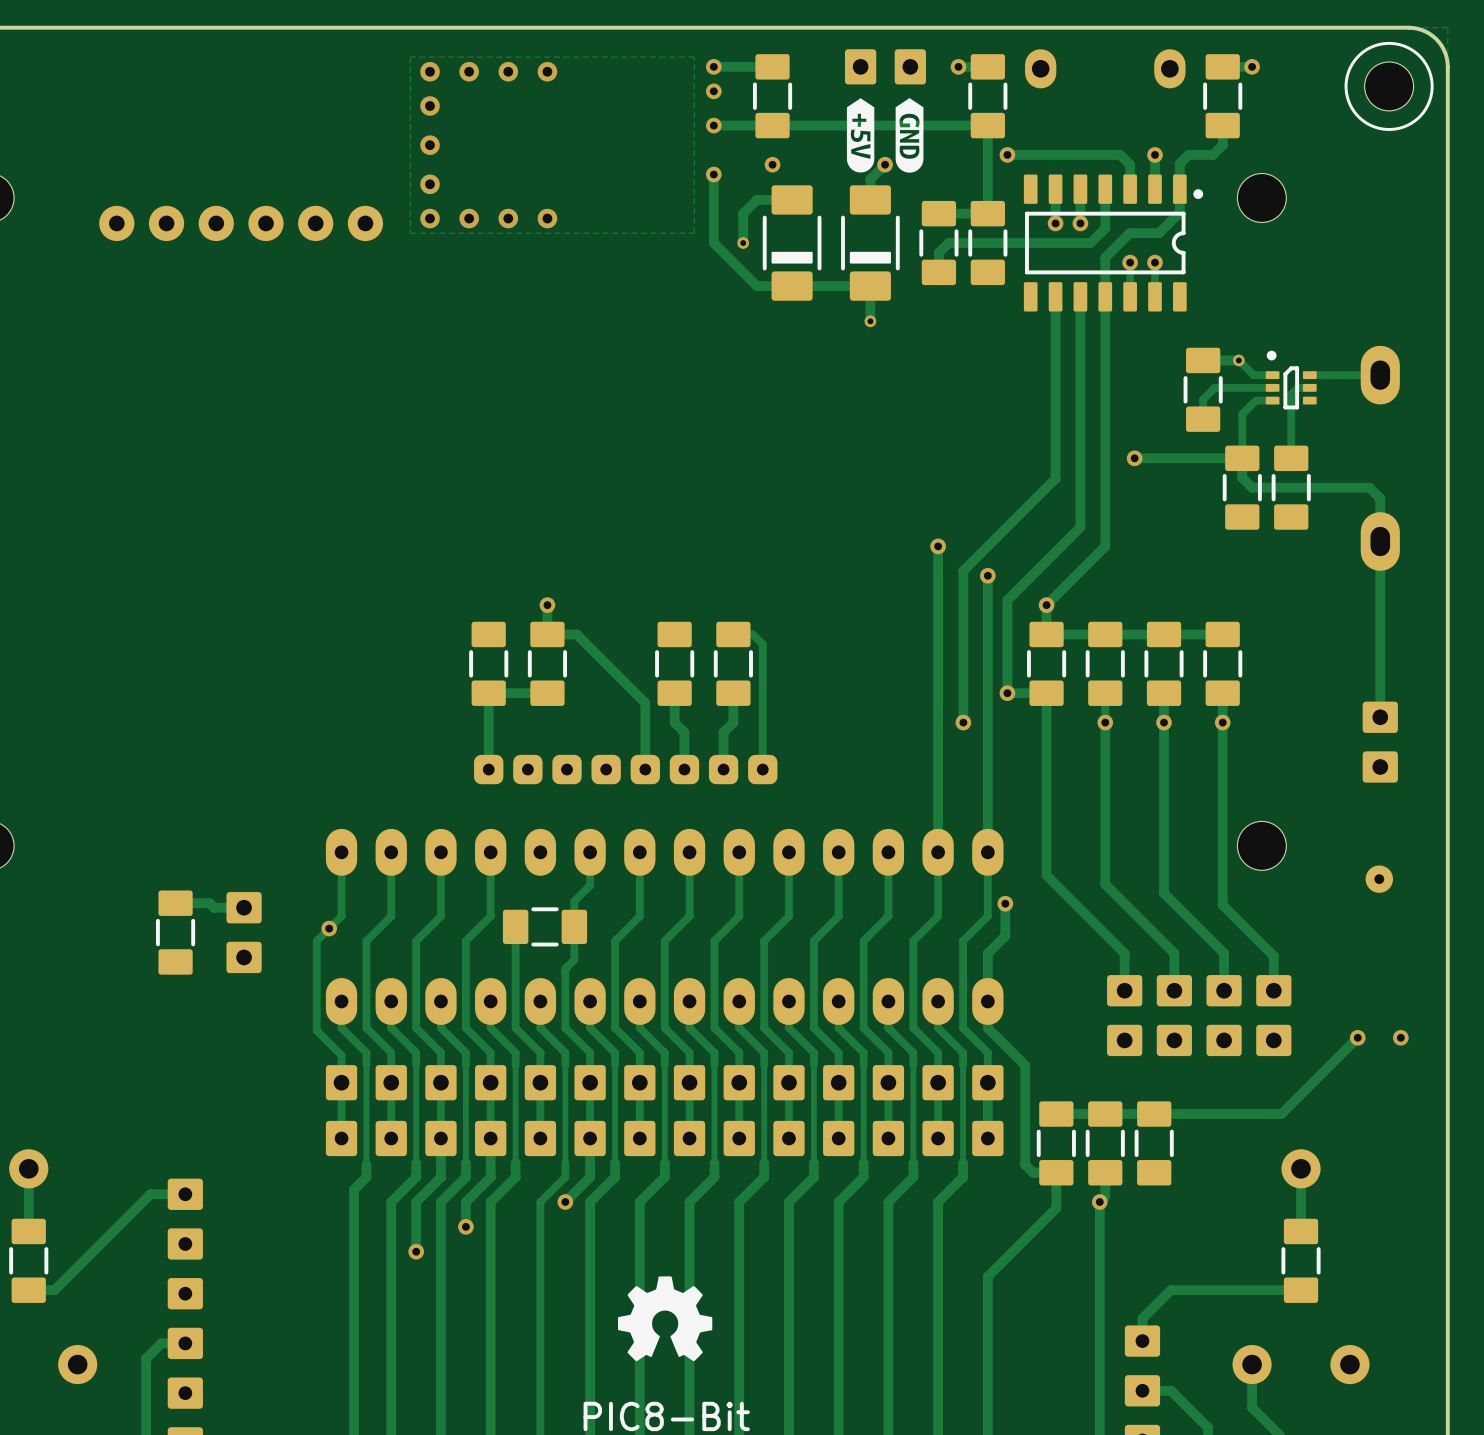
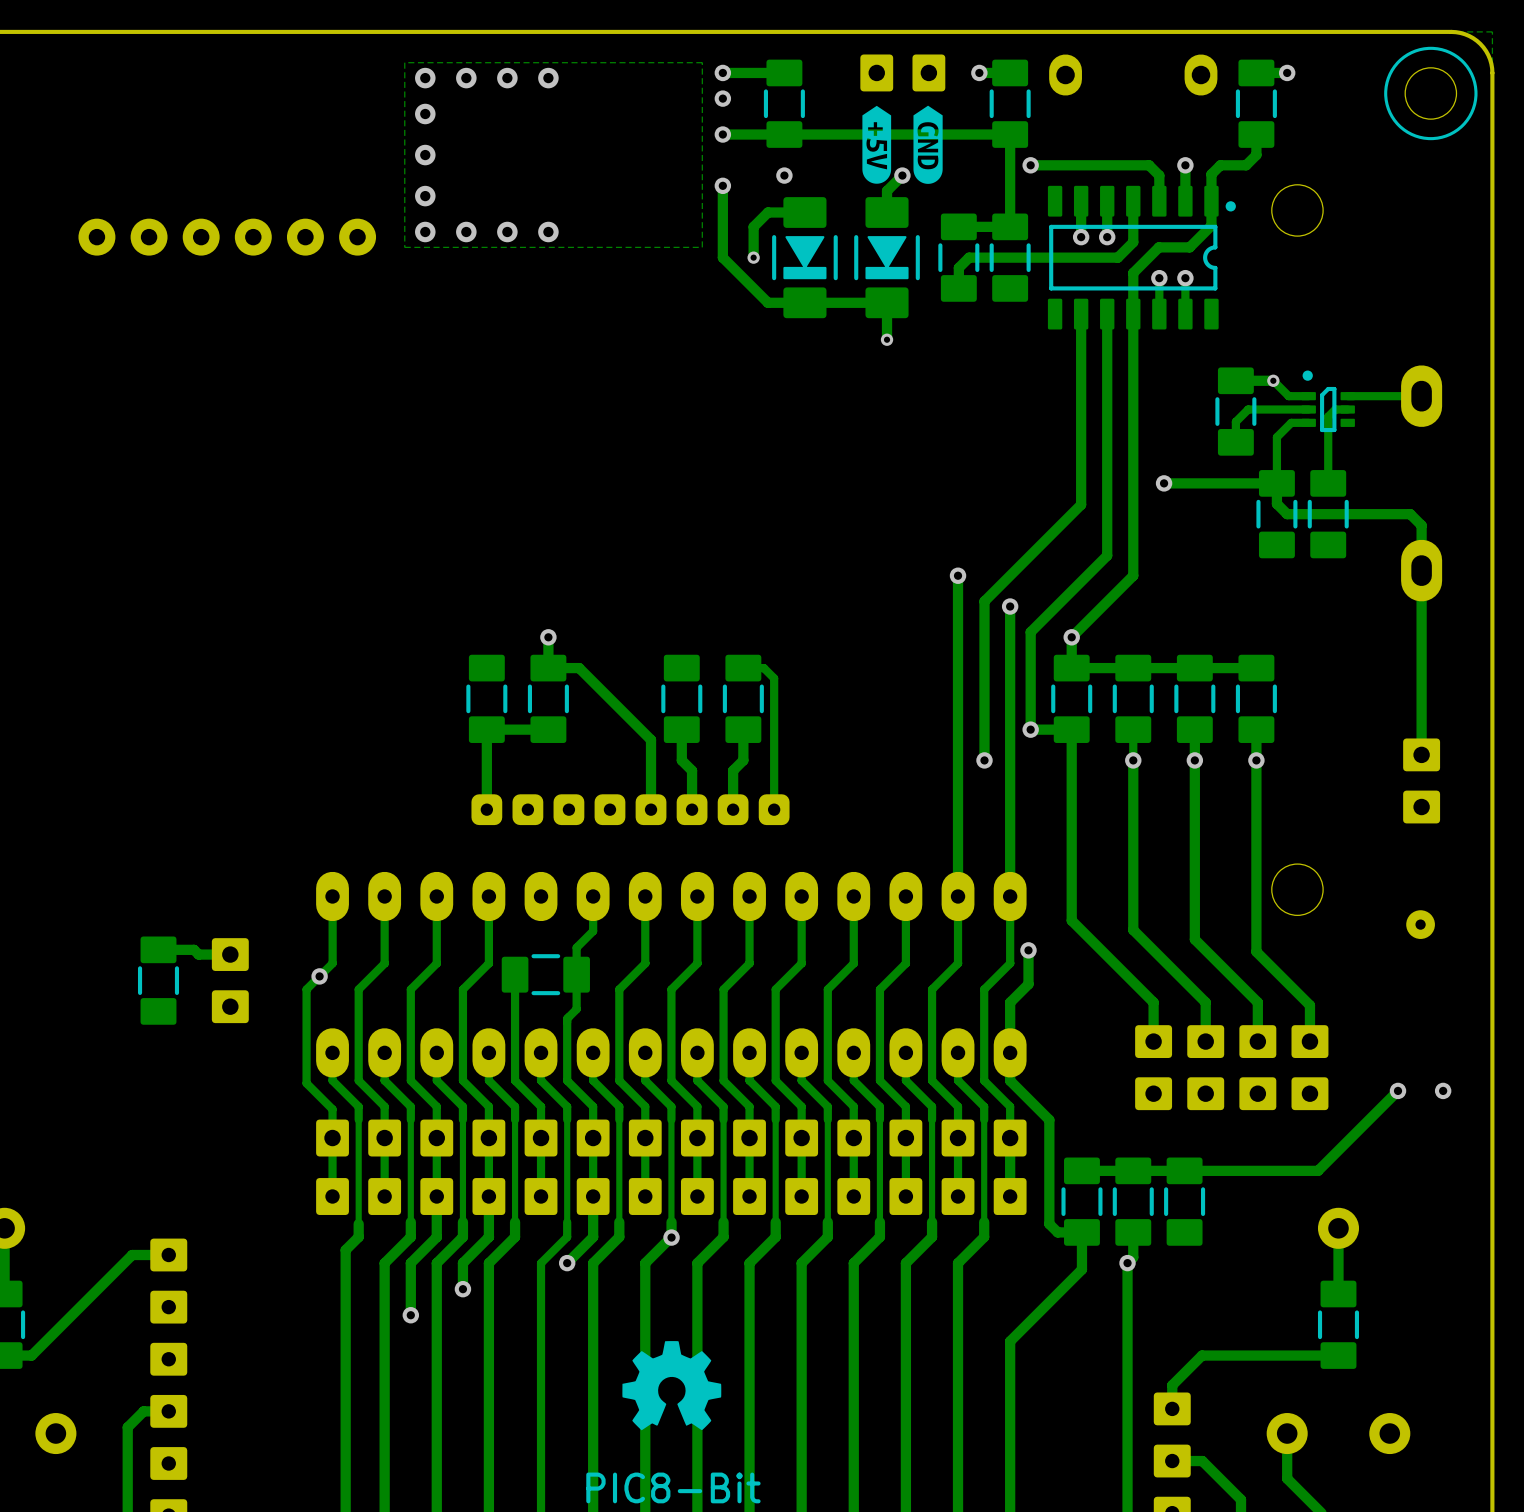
part footprint: [762, 185, 822, 301] -> [772, 197, 838, 319]
part footprint: [841, 185, 900, 301] -> [854, 197, 920, 319]
via: none -> (671, 1237)

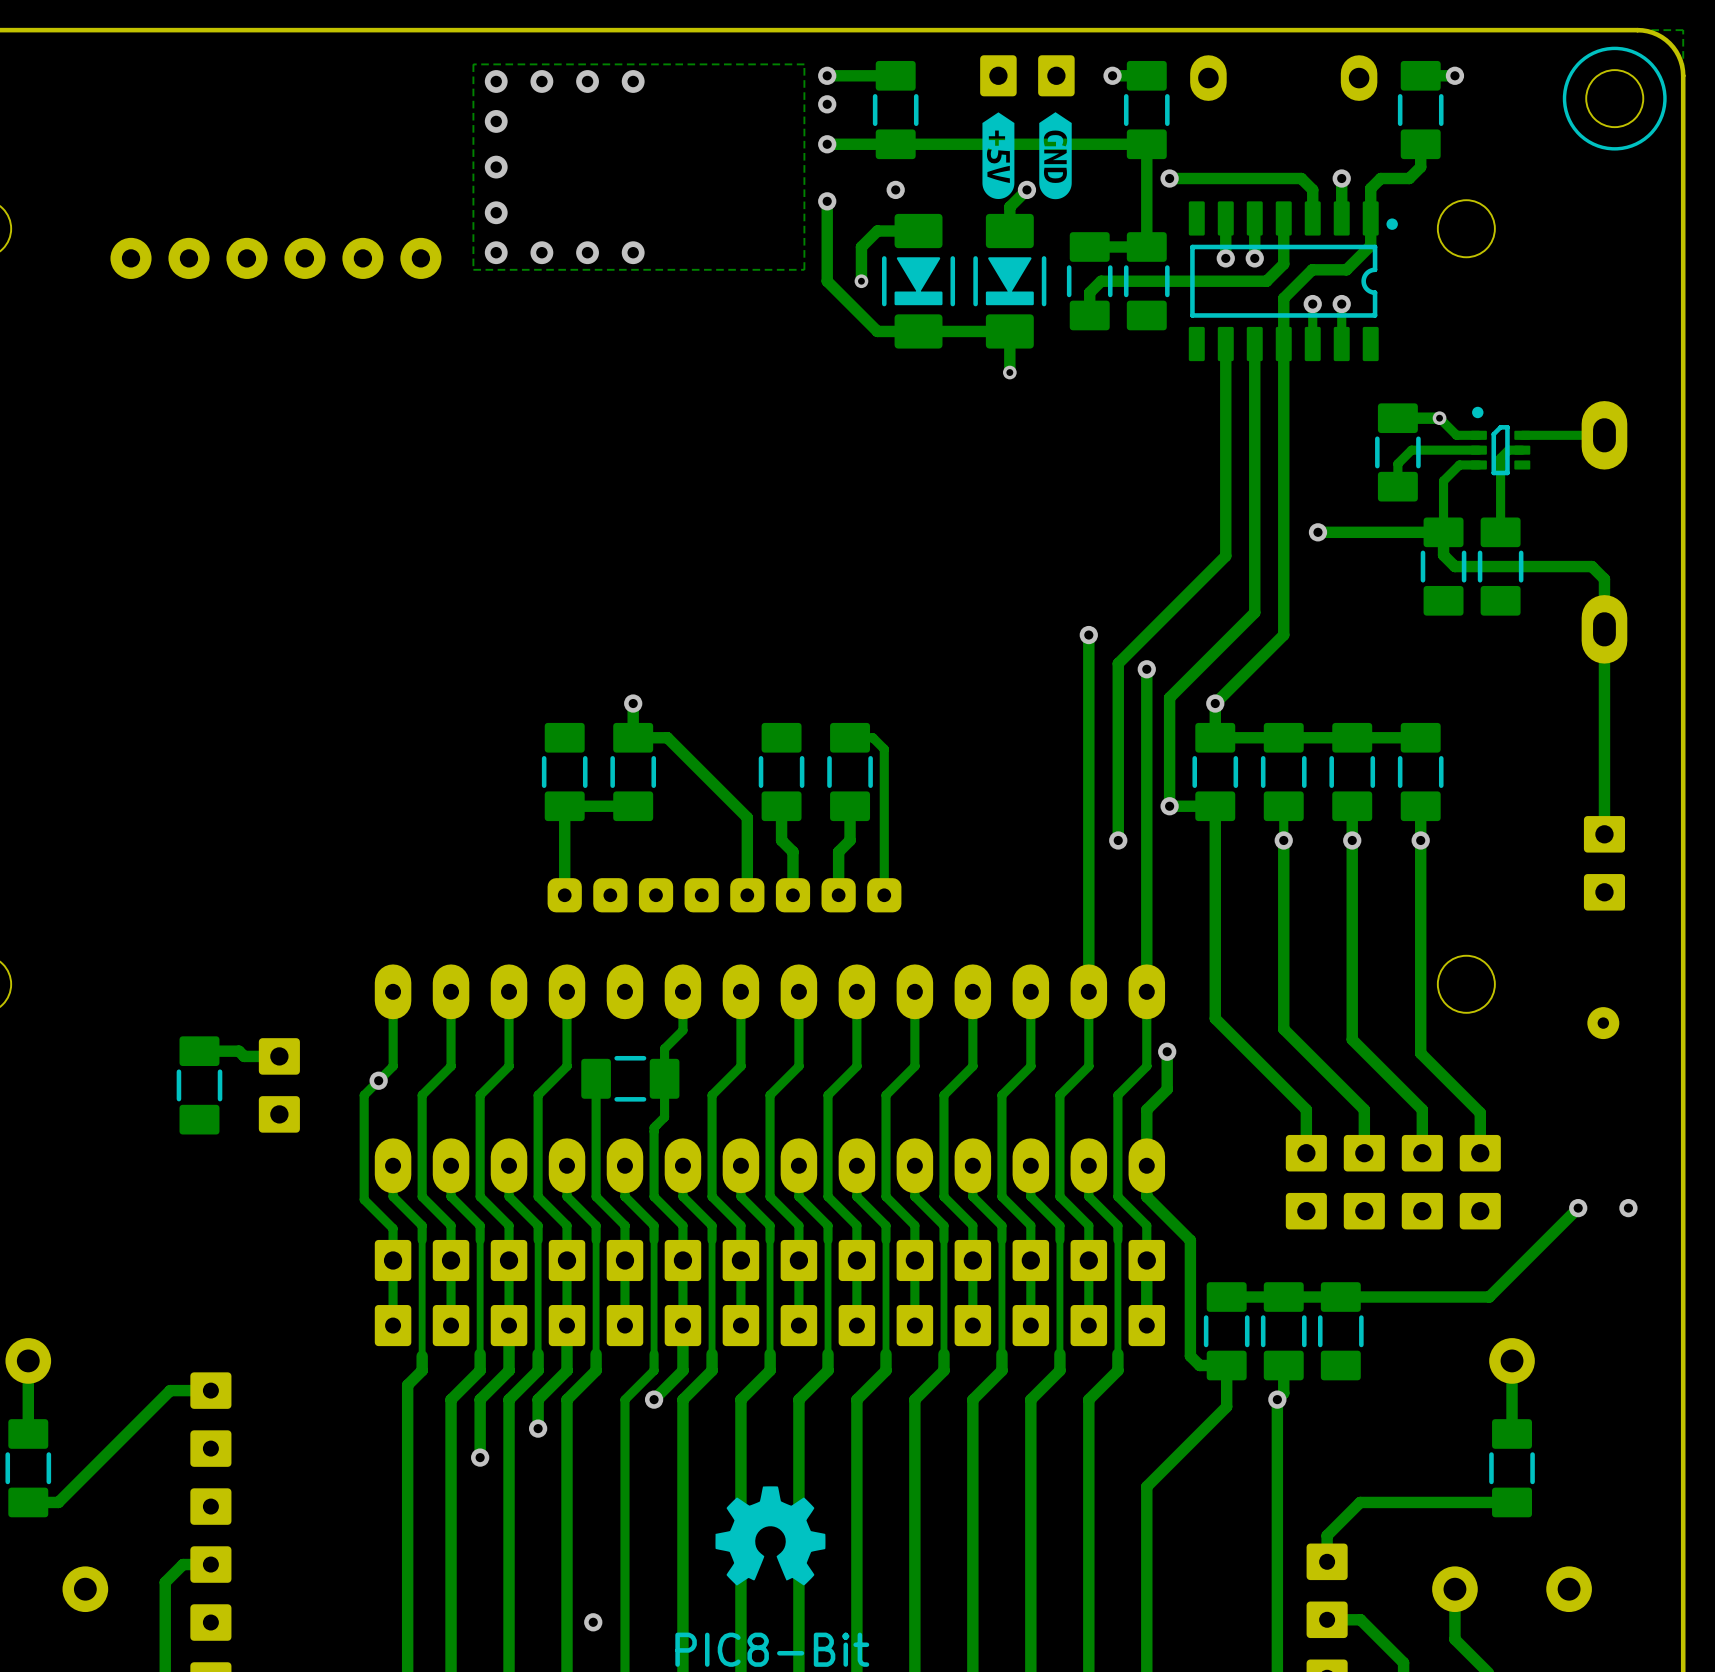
via: (671, 1237) -> none
via: none -> (593, 1622)

